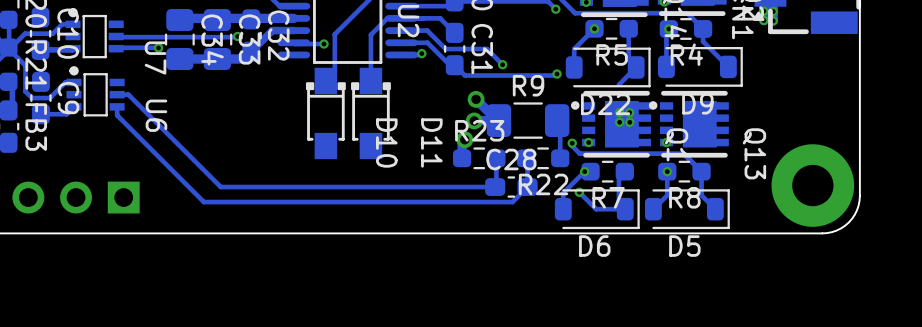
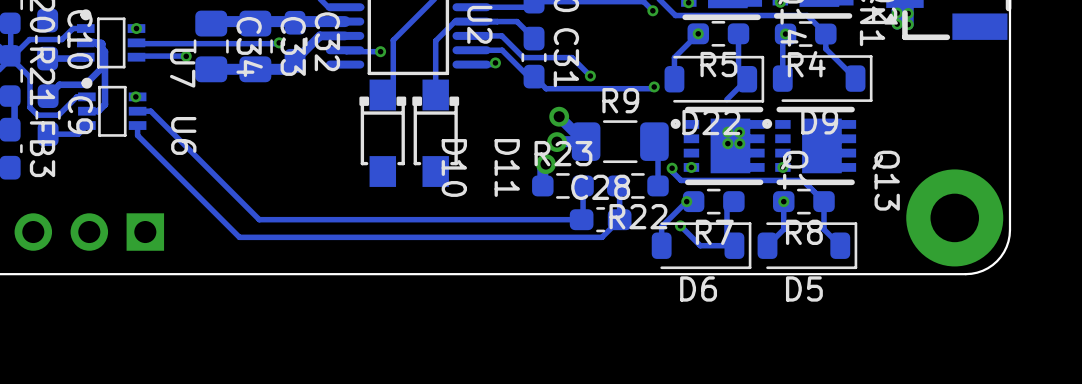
via: none -> (136, 28)
track: none -> (85, 42) (102, 43) (102, 67) (85, 84) (59, 84) (48, 96)
track: none -> (96, 42) (104, 51) (104, 104) (98, 111) (86, 111)
via: none -> (135, 96)

